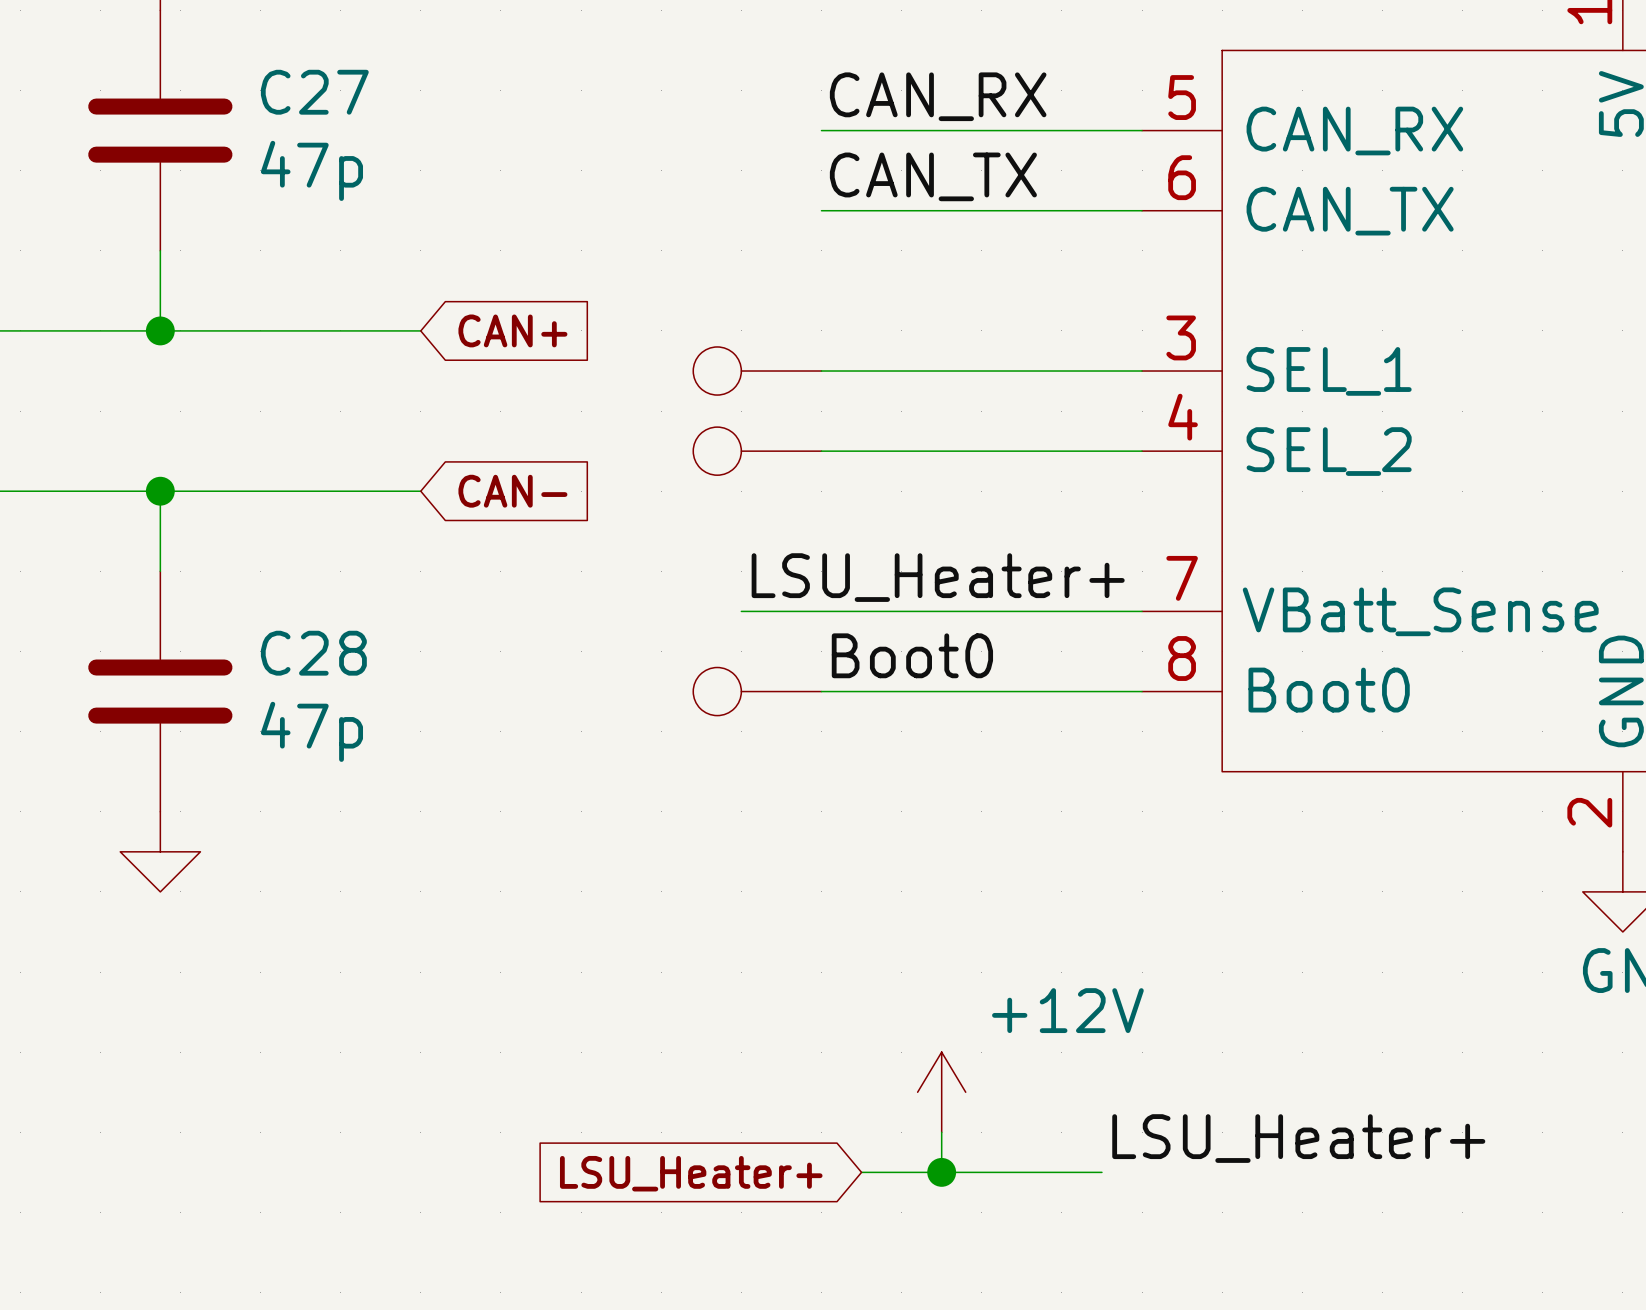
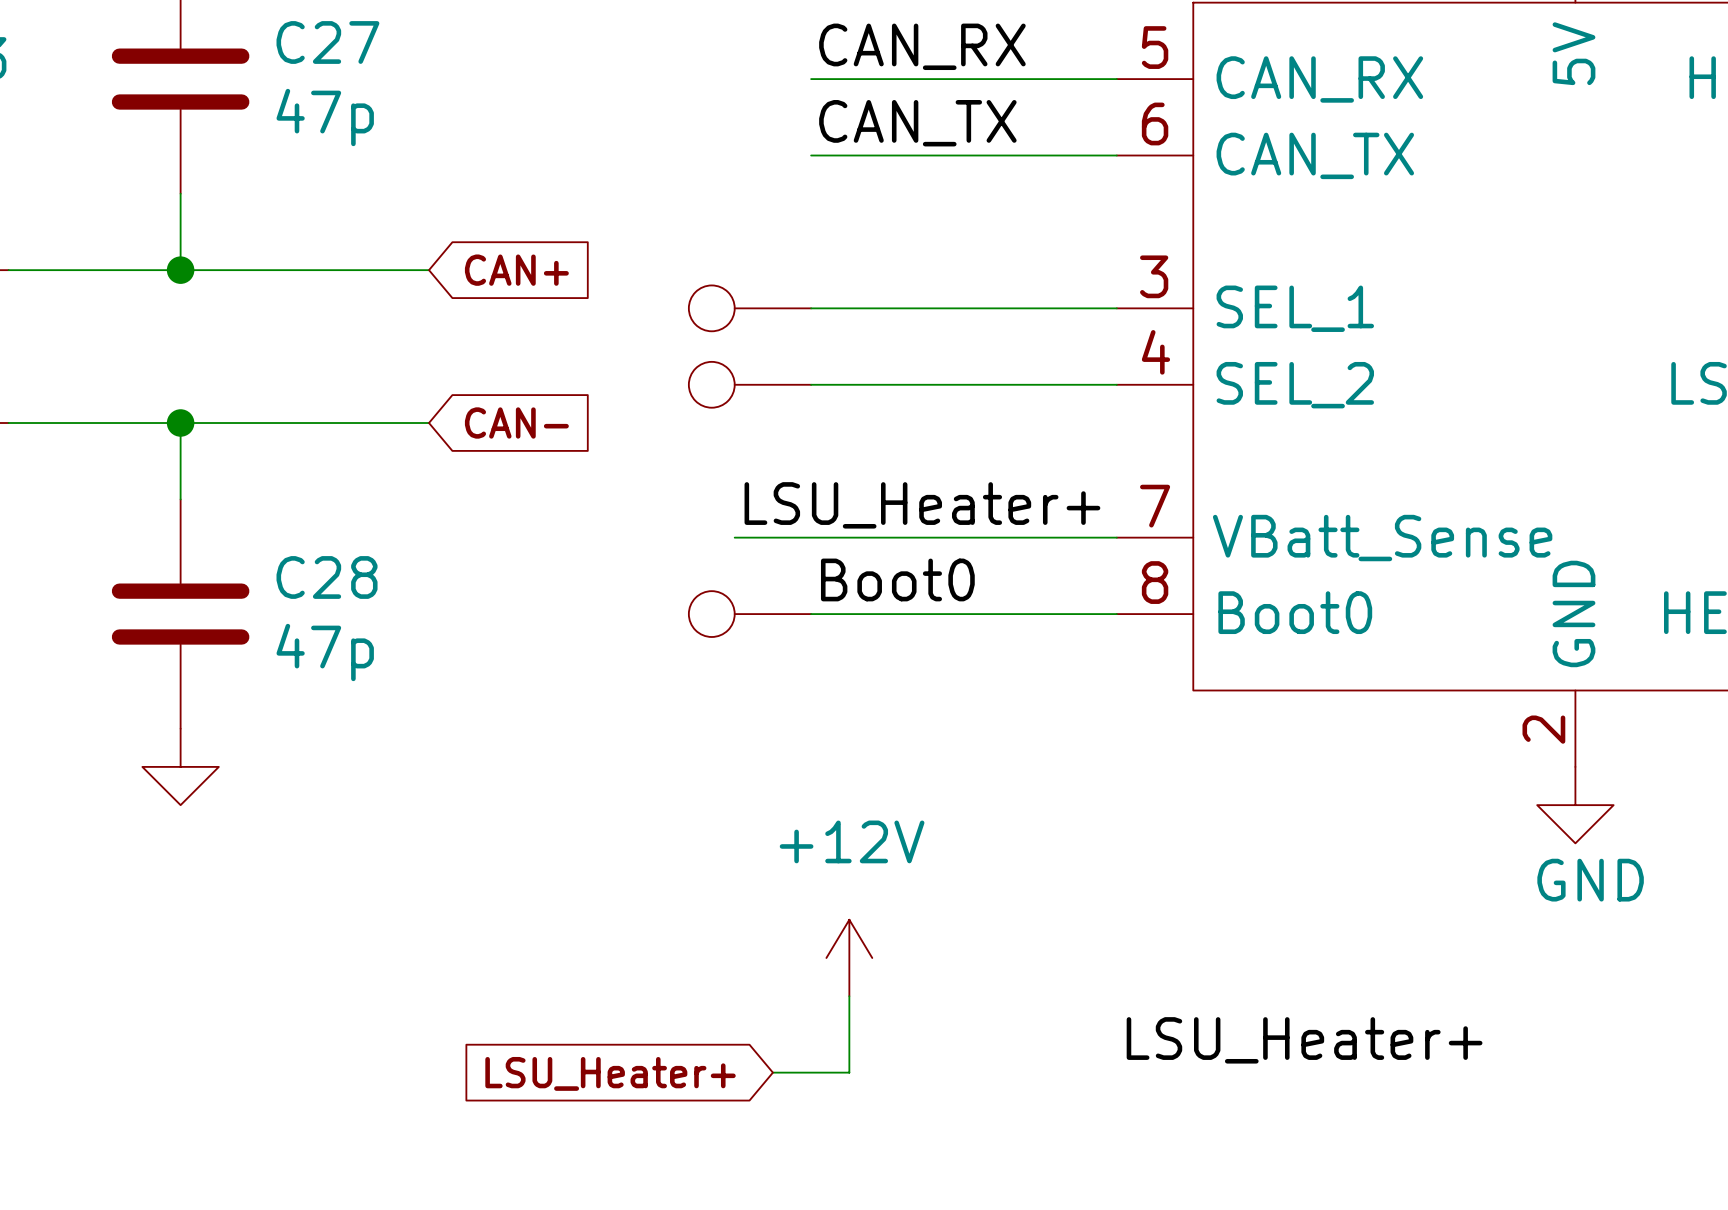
power symbol text position: +12V (1067, 1010) -> +12V (852, 841)
wire: none -> (849, 996) (849, 1072) (772, 1072)
power symbol position: +12V (941, 1092) -> +12V (849, 957)
wire: (941, 1132) (941, 1172) -> none
label position: LSU_Heater+ (1298, 1138) -> LSU_Heater+ (1304, 1040)
wire: (861, 1172) (1101, 1172) -> none
junction: (941, 1172) -> none
global label position: LSU_Heater+ (691, 1173) -> LSU_Heater+ (610, 1073)

